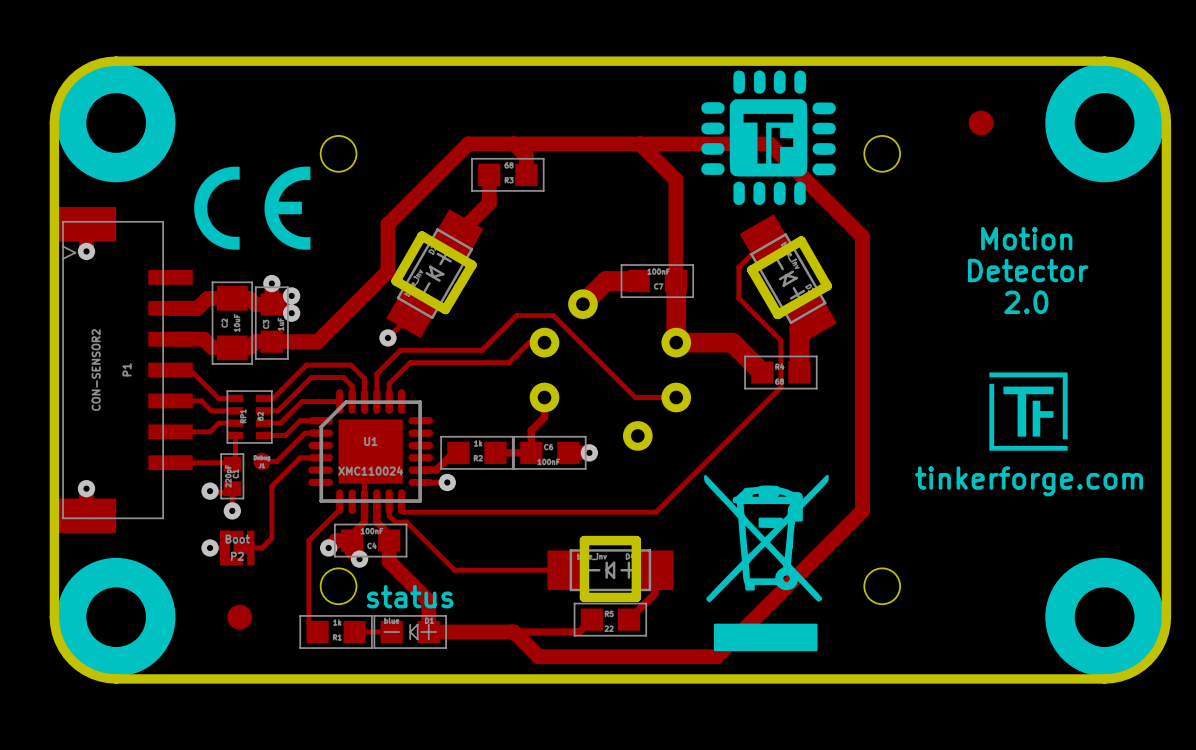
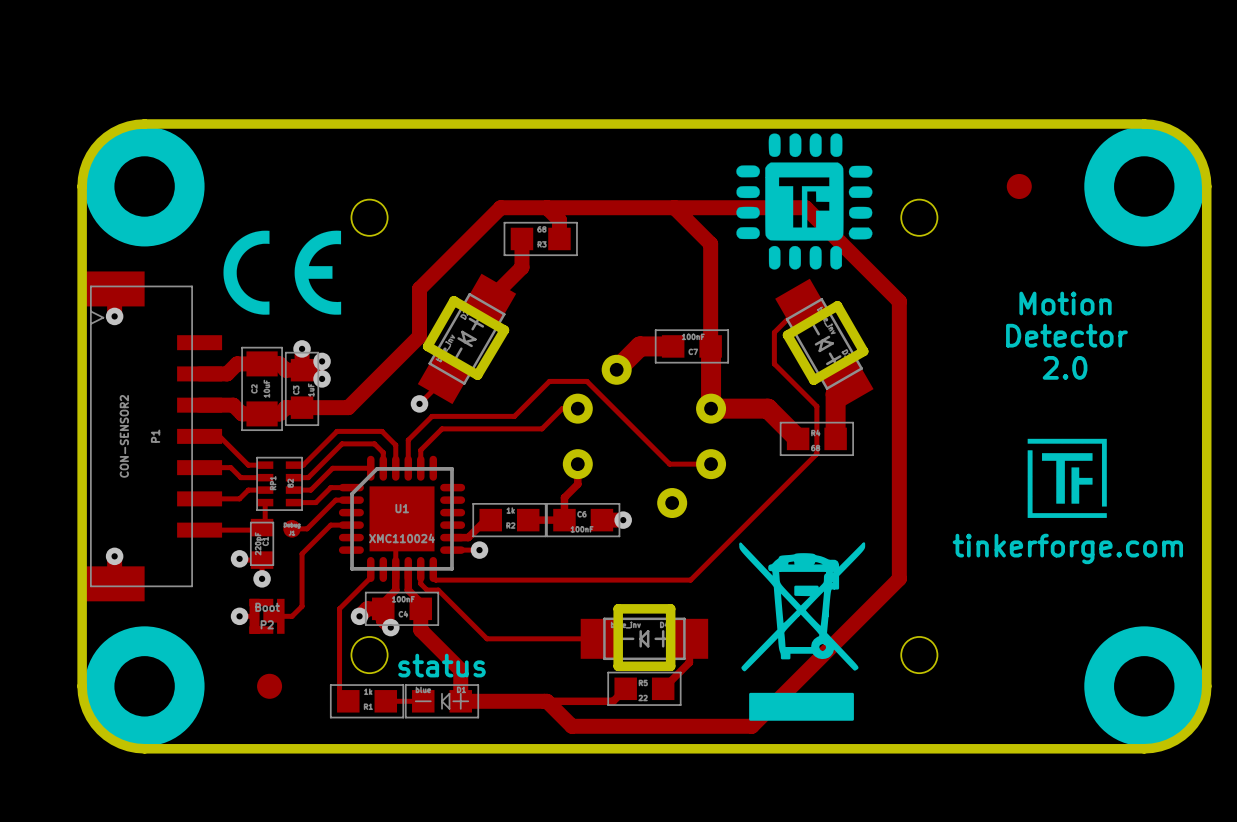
part footprint: [220, 453, 244, 499] -> [250, 518, 274, 569]

